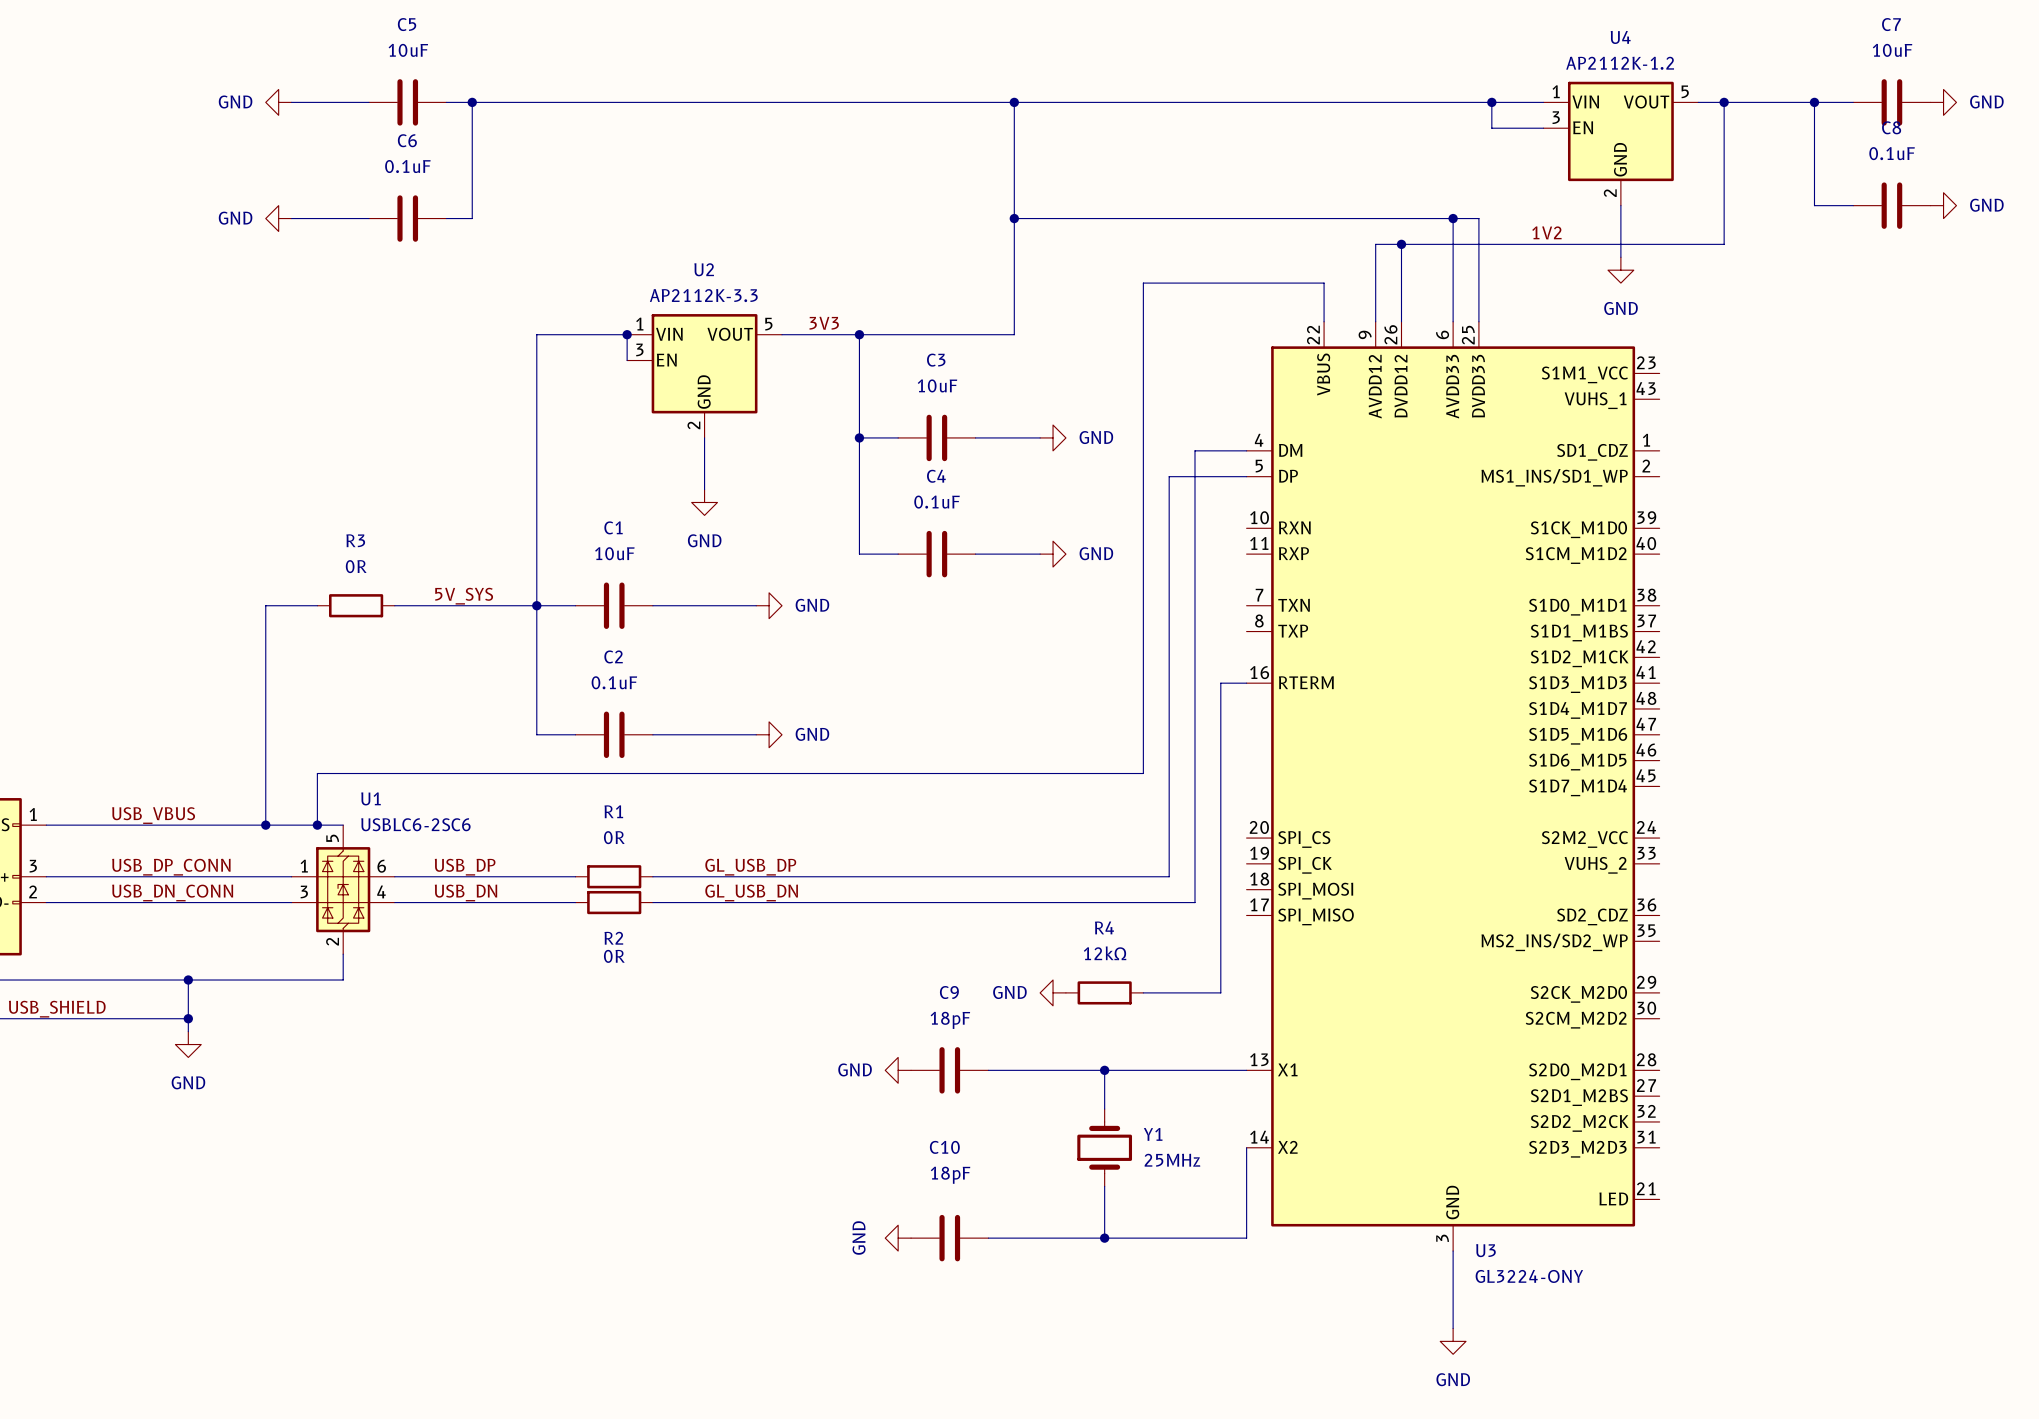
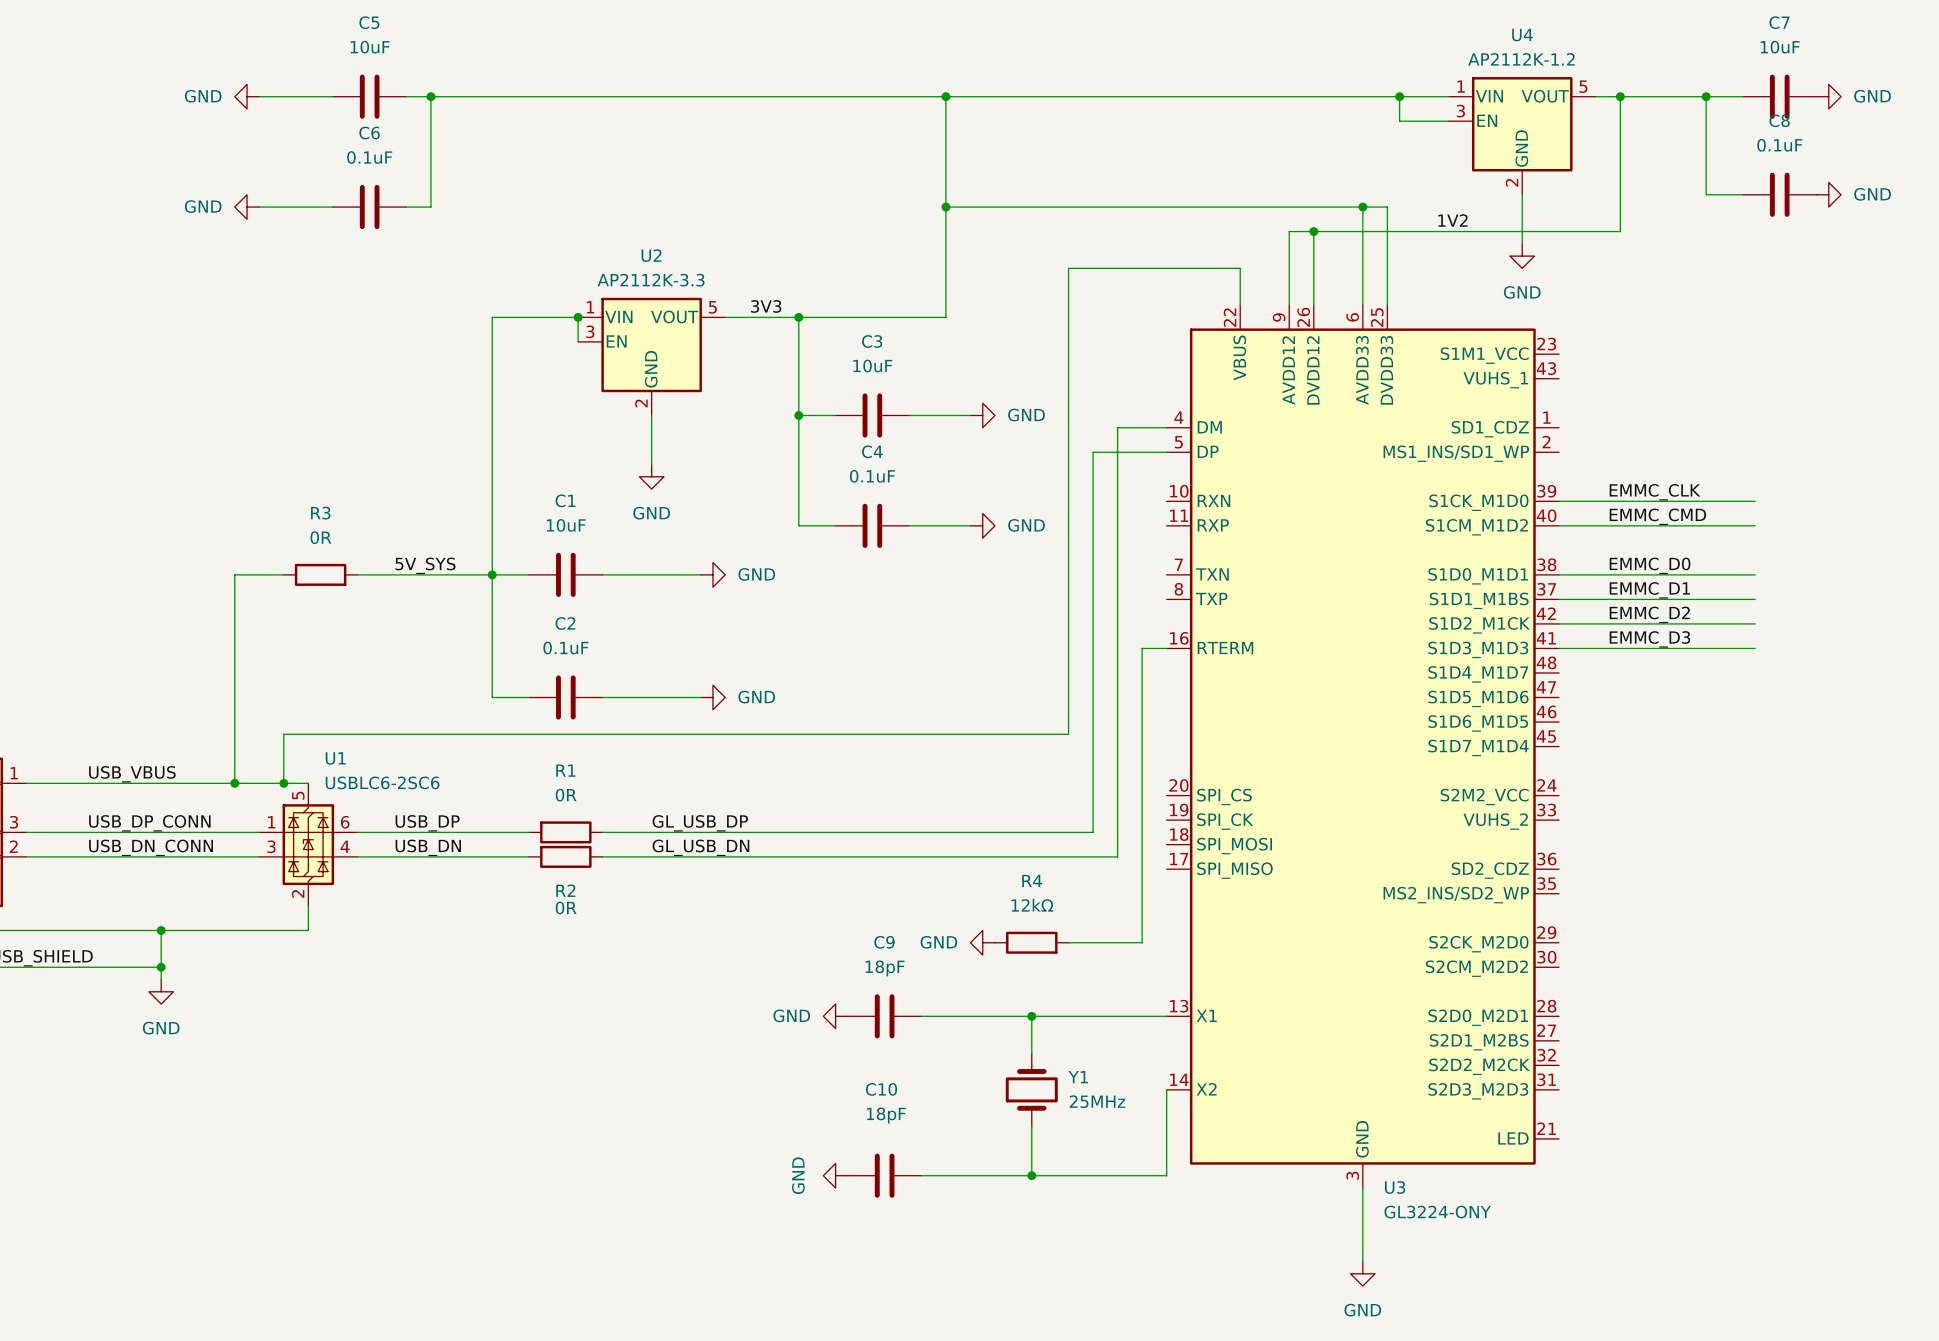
label: none -> EMMC_CLK (1655, 492)
wire: none -> (1559, 501) (1755, 501)
label: none -> EMMC_CMD (1657, 516)
wire: none -> (1559, 525) (1755, 525)
label: none -> EMMC_D0 (1650, 565)
wire: none -> (1559, 574) (1755, 574)
label: none -> EMMC_D1 (1649, 590)
wire: none -> (1559, 599) (1755, 599)
label: none -> EMMC_D2 (1649, 614)
wire: none -> (1559, 623) (1755, 623)
label: none -> EMMC_D3 (1649, 639)
wire: none -> (1559, 648) (1755, 648)

